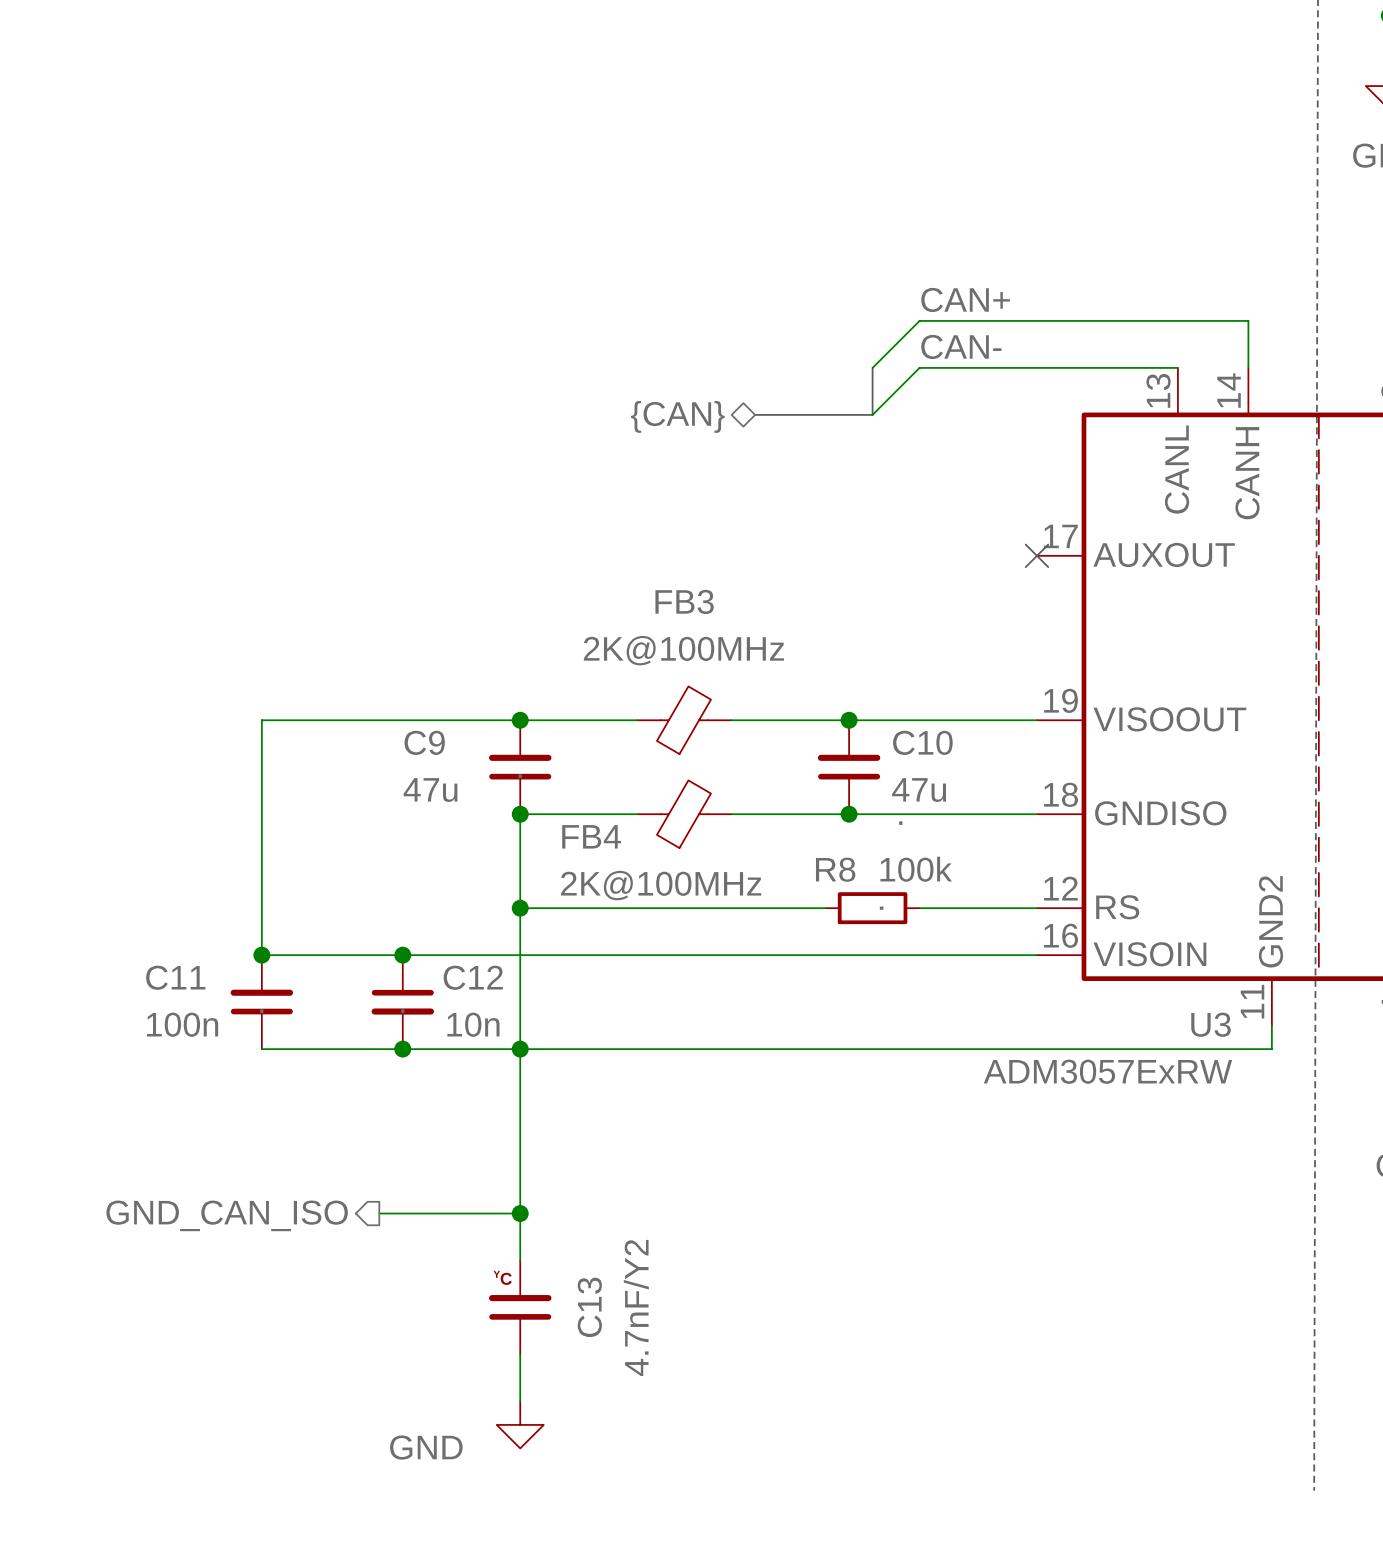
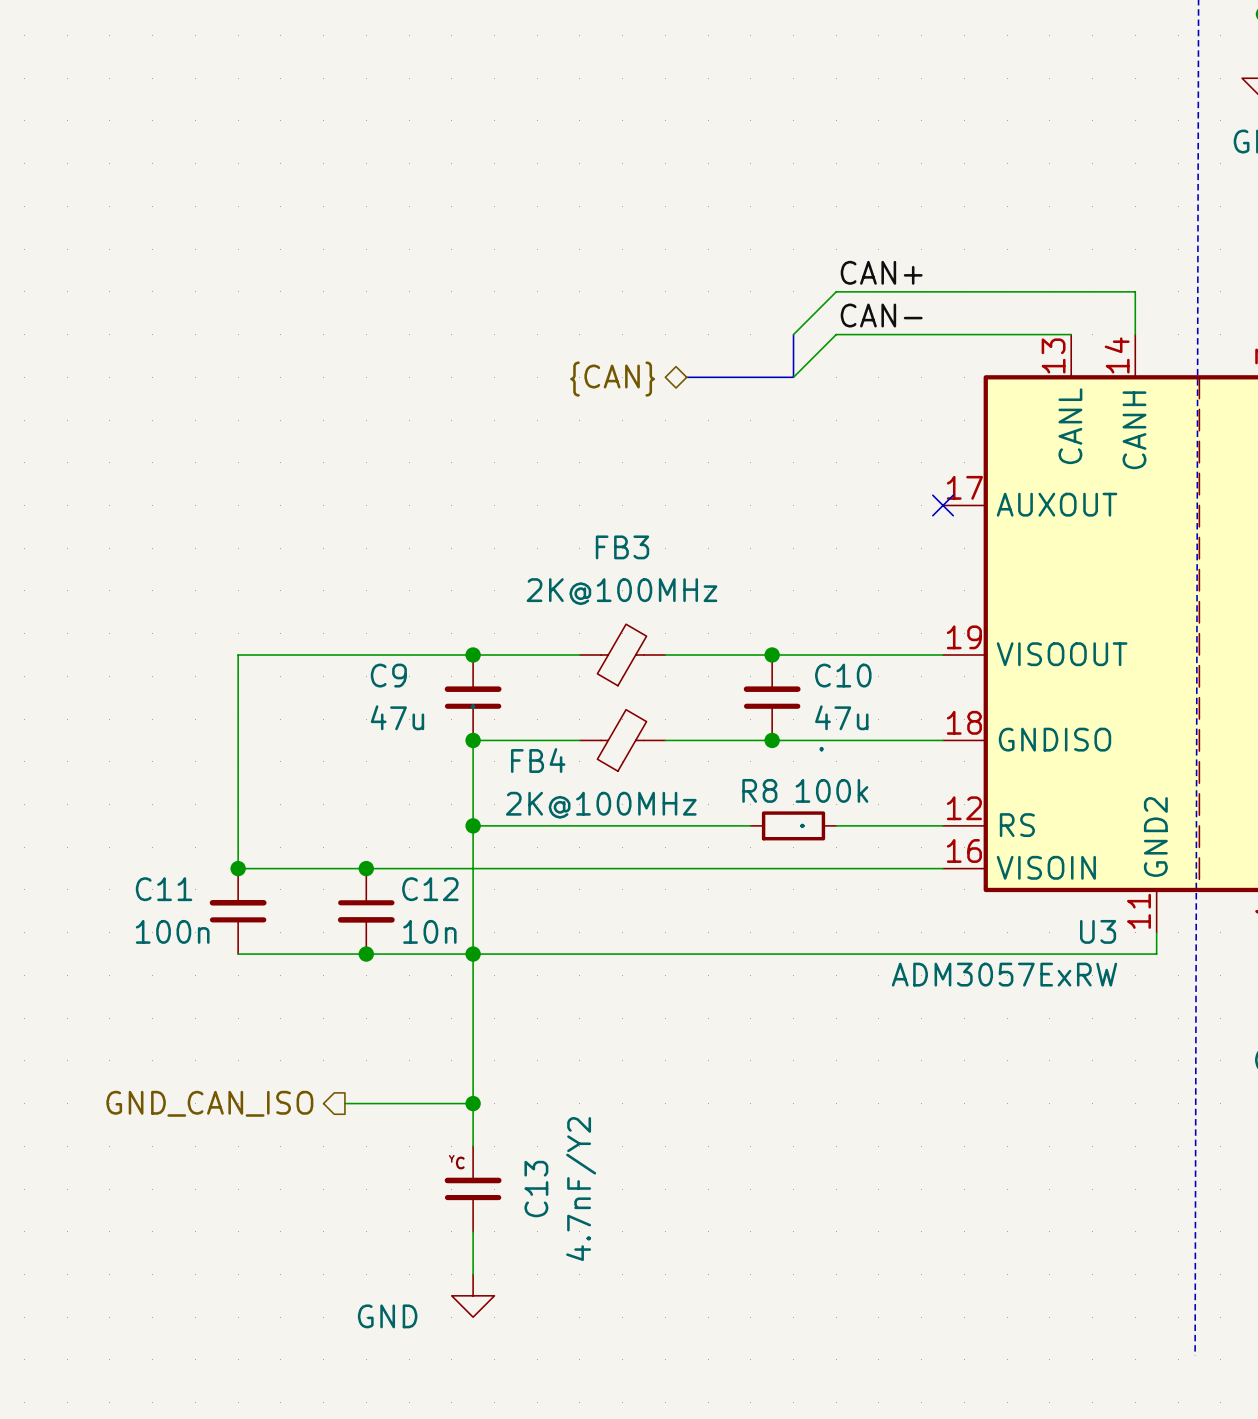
C11 text: . (261, 1011) -> none
C12 text: . (402, 1011) -> none

